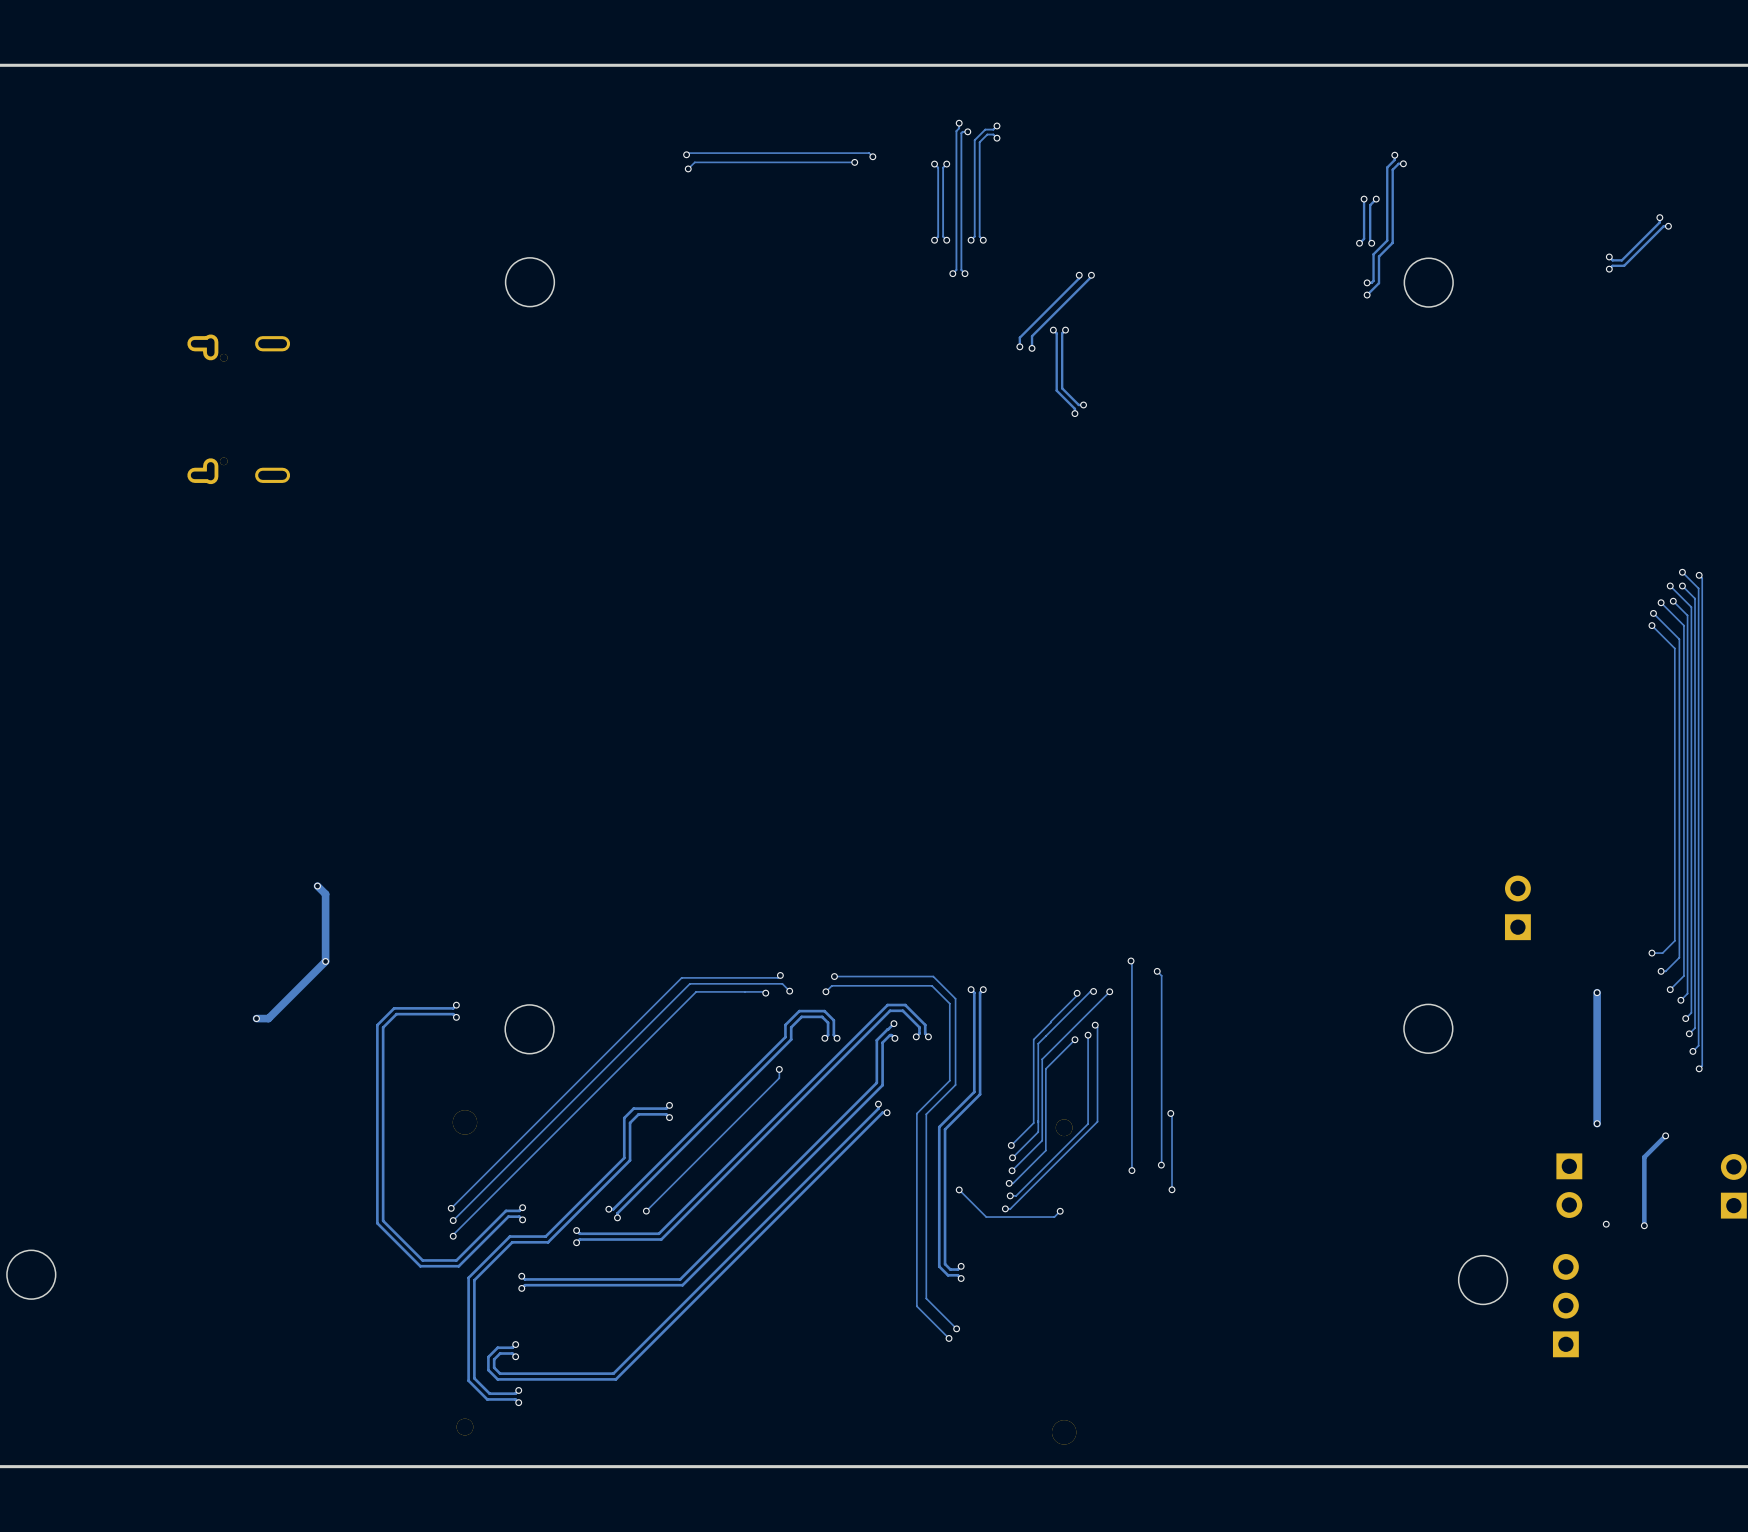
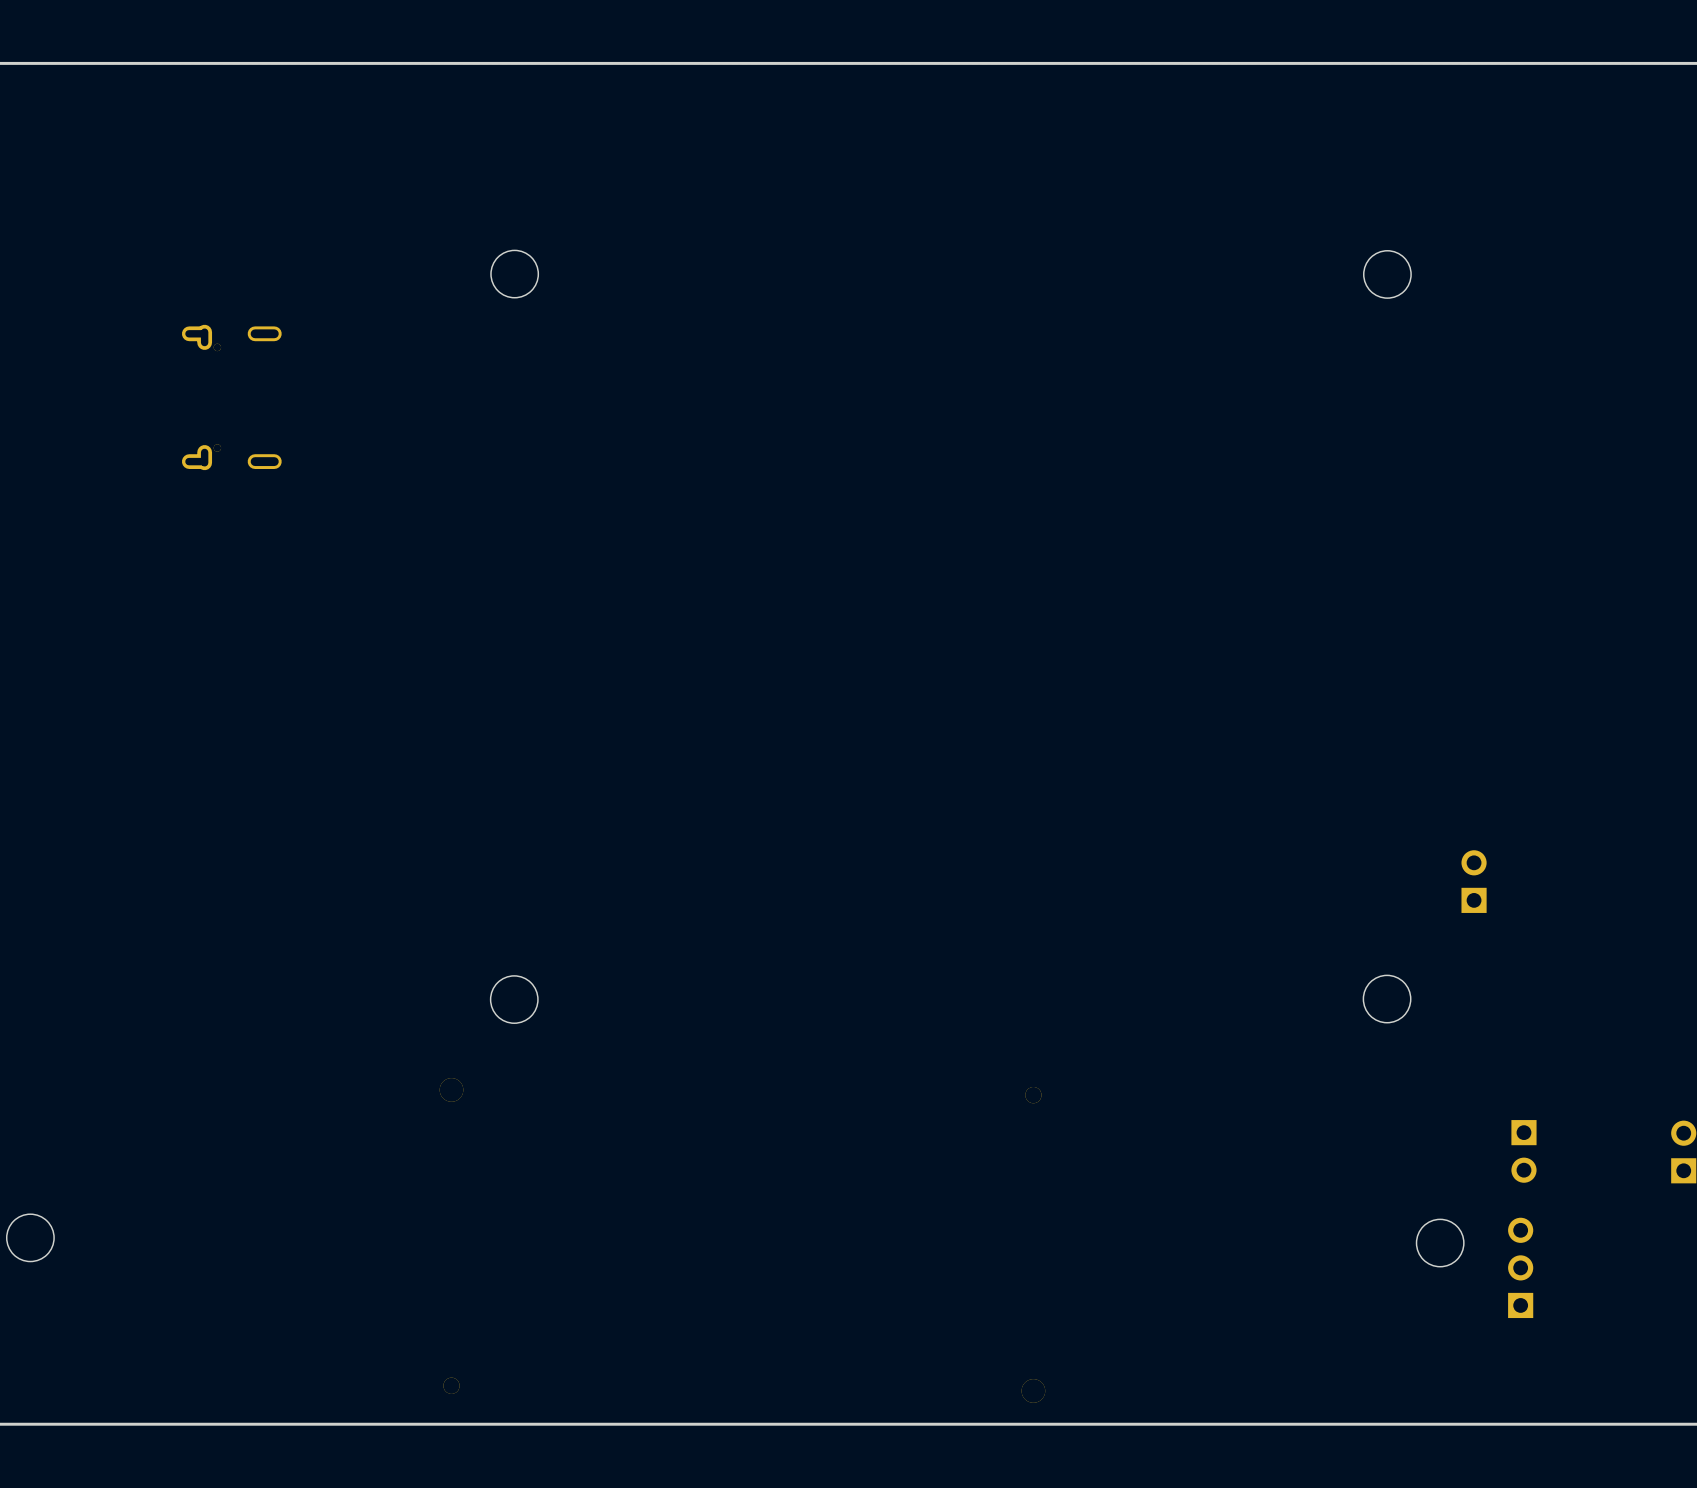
track: (959, 123) (959, 128) (956, 131) (956, 270) (952, 273) -> none
via: (959, 123) -> none
track: (996, 125) (993, 129) (985, 129) (974, 140) (974, 236) (971, 240) -> none
via: (996, 125) -> none
track: (967, 131) (961, 133) (961, 270) (965, 273) -> none
via: (967, 131) -> none
track: (996, 138) (993, 134) (987, 134) (979, 142) (979, 236) (983, 240) -> none
via: (996, 138) -> none
track: (686, 154) (688, 153) (869, 153) (872, 156) -> none
via: (686, 154) -> none
track: (1394, 155) (1394, 159) (1387, 167) (1387, 240) (1373, 254) (1373, 280) (1367, 282) -> none
via: (1394, 155) -> none
via: (872, 156) -> none
track: (854, 162) (694, 162) (688, 168) -> none
via: (854, 162) -> none
track: (1403, 163) (1398, 163) (1392, 169) (1392, 242) (1379, 256) (1379, 283) (1367, 295) -> none
via: (1403, 163) -> none
track: (934, 164) (938, 167) (938, 236) (934, 240) -> none
via: (934, 164) -> none
track: (946, 164) (943, 167) (943, 236) (946, 240) -> none
via: (946, 164) -> none
via: (688, 168) -> none
track: (1364, 199) (1364, 238) (1359, 243) -> none
via: (1364, 199) -> none
track: (1376, 199) (1370, 205) (1371, 243) -> none
via: (1376, 199) -> none
track: (1659, 217) (1659, 222) (1621, 260) (1612, 260) (1609, 256) -> none
via: (1659, 217) -> none
track: (1668, 226) (1663, 226) (1624, 265) (1612, 265) (1609, 269) -> none
via: (1668, 226) -> none
via: (934, 240) -> none
via: (946, 240) -> none
via: (971, 240) -> none
via: (983, 240) -> none
via: (1359, 243) -> none
via: (1371, 243) -> none
via: (1609, 256) -> none
via: (1609, 269) -> none
via: (952, 273) -> none
via: (965, 273) -> none
track: (1079, 275) (1079, 278) (1019, 337) (1019, 346) -> none
via: (1079, 275) -> none
track: (1091, 275) (1032, 336) (1032, 348) -> none
via: (1091, 275) -> none
via: (1367, 282) -> none
via: (1367, 295) -> none
track: (1053, 330) (1056, 333) (1056, 390) (1074, 408) (1074, 413) -> none
via: (1053, 330) -> none
track: (1065, 330) (1062, 333) (1062, 388) (1078, 404) (1083, 404) -> none
via: (1065, 330) -> none
via: (1019, 346) -> none
via: (1032, 348) -> none
via: (1083, 404) -> none
via: (1074, 413) -> none
track: (1682, 572) (1698, 588) (1698, 1045) (1692, 1051) -> none
via: (1682, 572) -> none
track: (1699, 575) (1702, 578) (1702, 1065) (1699, 1068) -> none
via: (1699, 575) -> none
track: (1670, 585) (1691, 607) (1691, 1012) (1685, 1018) -> none
via: (1670, 585) -> none
track: (1682, 585) (1695, 598) (1695, 1028) (1689, 1033) -> none
via: (1682, 585) -> none
track: (1673, 601) (1687, 615) (1687, 993) (1680, 1000) -> none
via: (1673, 601) -> none
track: (1661, 602) (1683, 625) (1683, 975) (1670, 989) -> none
via: (1661, 602) -> none
track: (1653, 613) (1679, 639) (1679, 957) (1665, 971) (1661, 971) -> none
via: (1653, 613) -> none
track: (1651, 625) (1674, 648) (1674, 940) (1662, 953) (1651, 953) -> none
via: (1651, 625) -> none
track: (317, 886) (325, 894) (325, 961) (268, 1018) (256, 1018) -> none
via: (317, 886) -> none
via: (1651, 953) -> none
via: (325, 961) -> none
track: (1131, 961) (1131, 1170) -> none
via: (1131, 961) -> none
track: (1157, 971) (1161, 975) (1161, 1165) -> none
via: (1157, 971) -> none
via: (1661, 971) -> none
track: (780, 975) (777, 977) (681, 977) (451, 1208) -> none
via: (780, 975) -> none
track: (834, 976) (933, 976) (955, 998) (955, 1084) (926, 1114) (926, 1298) (956, 1328) -> none
via: (834, 976) -> none
track: (971, 989) (974, 992) (974, 1092) (939, 1127) (939, 1266) (948, 1275) (957, 1275) (961, 1278) -> none
via: (971, 989) -> none
track: (983, 989) (980, 992) (980, 1094) (945, 1129) (945, 1264) (950, 1269) (957, 1269) (961, 1266) -> none
via: (983, 989) -> none
via: (1670, 989) -> none
track: (789, 991) (782, 983) (689, 983) (453, 1220) -> none
via: (789, 991) -> none
track: (825, 991) (831, 985) (931, 985) (949, 1003) (949, 1080) (916, 1113) (916, 1306) (949, 1338) -> none
via: (825, 991) -> none
track: (1093, 991) (1090, 991) (1038, 1043) (1038, 1132) (1012, 1157) -> none
via: (1093, 991) -> none
track: (1109, 991) (1042, 1059) (1042, 1140) (1012, 1170) -> none
via: (1109, 991) -> none
track: (1597, 992) (1597, 1123) -> none
via: (1597, 992) -> none
track: (765, 993) (696, 991) (453, 1236) -> none
via: (765, 993) -> none
track: (1077, 993) (1033, 1039) (1033, 1123) (1011, 1145) -> none
via: (1077, 993) -> none
via: (1680, 1000) -> none
track: (456, 1005) (453, 1008) (394, 1008) (377, 1025) (377, 1223) (420, 1266) (458, 1266) (508, 1216) (519, 1216) (522, 1219) -> none
via: (456, 1005) -> none
track: (456, 1017) (453, 1014) (396, 1014) (383, 1027) (383, 1220) (422, 1260) (456, 1260) (506, 1210) (519, 1210) (522, 1207) -> none
via: (456, 1017) -> none
via: (256, 1018) -> none
via: (1685, 1018) -> none
track: (893, 1023) (876, 1040) (876, 1082) (680, 1279) (524, 1279) (521, 1276) -> none
via: (893, 1023) -> none
track: (1095, 1025) (1097, 1027) (1097, 1121) (1010, 1208) (1005, 1208) -> none
via: (1095, 1025) -> none
via: (1689, 1033) -> none
track: (1088, 1035) (1088, 1123) (1016, 1195) (1010, 1195) -> none
via: (1088, 1035) -> none
track: (916, 1036) (919, 1033) (919, 1027) (902, 1010) (890, 1010) (661, 1239) (579, 1239) (576, 1242) -> none
via: (916, 1036) -> none
track: (928, 1036) (925, 1033) (925, 1024) (905, 1005) (887, 1005) (658, 1233) (579, 1233) (576, 1230) -> none
via: (928, 1036) -> none
track: (824, 1038) (828, 1035) (828, 1022) (822, 1016) (801, 1016) (791, 1027) (791, 1039) (617, 1213) (617, 1217) -> none
via: (824, 1038) -> none
track: (837, 1038) (833, 1035) (833, 1020) (824, 1011) (799, 1011) (785, 1024) (785, 1037) (613, 1209) (608, 1209) -> none
via: (837, 1038) -> none
track: (894, 1038) (890, 1035) (882, 1042) (882, 1085) (682, 1285) (524, 1285) (521, 1288) -> none
via: (894, 1038) -> none
track: (1074, 1039) (1045, 1068) (1045, 1150) (1013, 1183) (1009, 1183) -> none
via: (1074, 1039) -> none
via: (1692, 1051) -> none
via: (1699, 1068) -> none
track: (779, 1069) (779, 1078) (646, 1211) -> none
via: (779, 1069) -> none
track: (878, 1104) (878, 1108) (613, 1373) (500, 1373) (494, 1367) (494, 1359) (500, 1353) (512, 1353) (515, 1356) -> none
via: (878, 1104) -> none
track: (669, 1105) (666, 1108) (633, 1108) (624, 1118) (624, 1157) (545, 1236) (509, 1236) (468, 1277) (468, 1380) (487, 1399) (515, 1399) (518, 1402) -> none
via: (669, 1105) -> none
track: (887, 1112) (882, 1112) (615, 1379) (497, 1379) (488, 1370) (488, 1357) (497, 1347) (512, 1347) (515, 1344) -> none
via: (887, 1112) -> none
track: (1170, 1113) (1172, 1189) -> none
via: (1170, 1113) -> none
track: (669, 1117) (666, 1114) (638, 1114) (630, 1122) (630, 1160) (548, 1242) (512, 1242) (474, 1280) (474, 1378) (489, 1393) (515, 1393) (518, 1390) -> none
via: (669, 1117) -> none
via: (1597, 1123) -> none
track: (1665, 1135) (1644, 1157) (1644, 1225) -> none
via: (1665, 1135) -> none
via: (1011, 1145) -> none
via: (1012, 1157) -> none
via: (1161, 1165) -> none
via: (1012, 1170) -> none
via: (1131, 1170) -> none
via: (1009, 1183) -> none
track: (959, 1189) (986, 1217) (1054, 1217) (1060, 1211) -> none
via: (959, 1189) -> none
via: (1172, 1189) -> none
via: (1010, 1195) -> none
via: (522, 1207) -> none
via: (451, 1208) -> none
via: (1005, 1208) -> none
via: (608, 1209) -> none
via: (646, 1211) -> none
via: (1060, 1211) -> none
via: (617, 1217) -> none
via: (522, 1219) -> none
via: (453, 1220) -> none
via: (1606, 1224) -> none
via: (1644, 1225) -> none
via: (576, 1230) -> none
via: (453, 1236) -> none
via: (576, 1242) -> none
via: (961, 1266) -> none
via: (521, 1276) -> none
via: (961, 1278) -> none
via: (521, 1288) -> none
via: (956, 1328) -> none
via: (949, 1338) -> none
via: (515, 1344) -> none
via: (515, 1356) -> none
via: (518, 1390) -> none
via: (518, 1402) -> none

